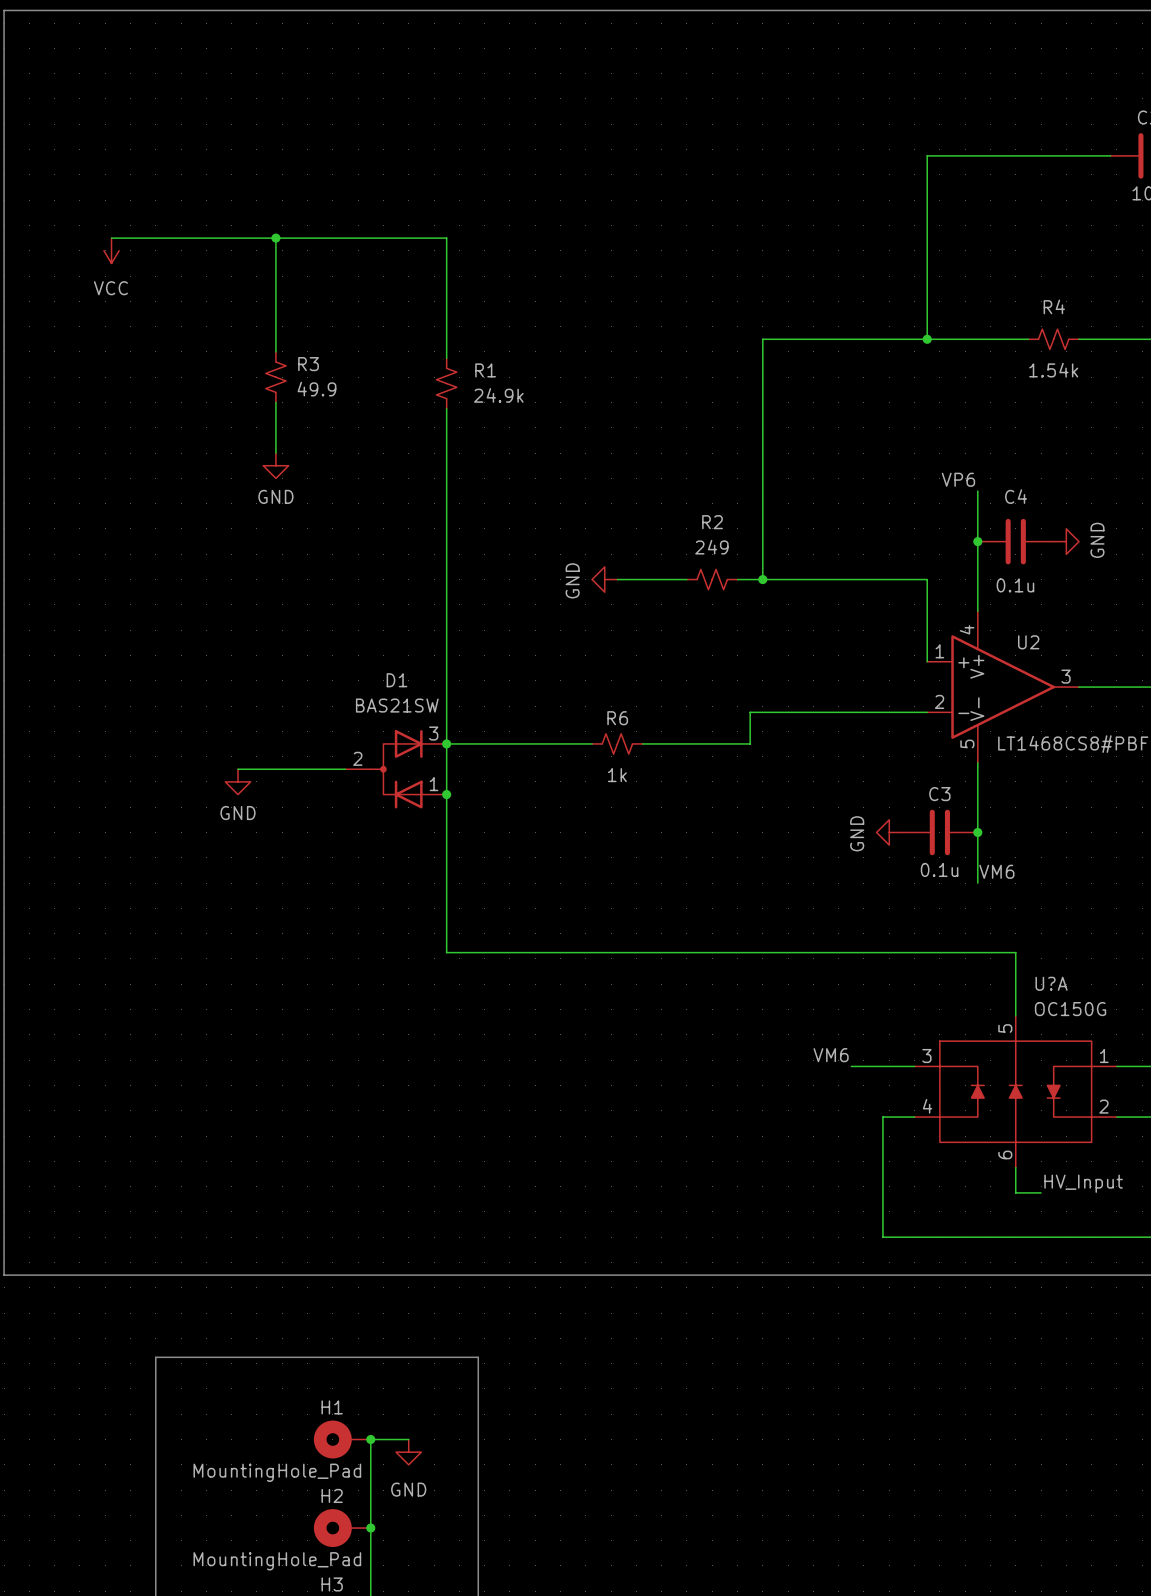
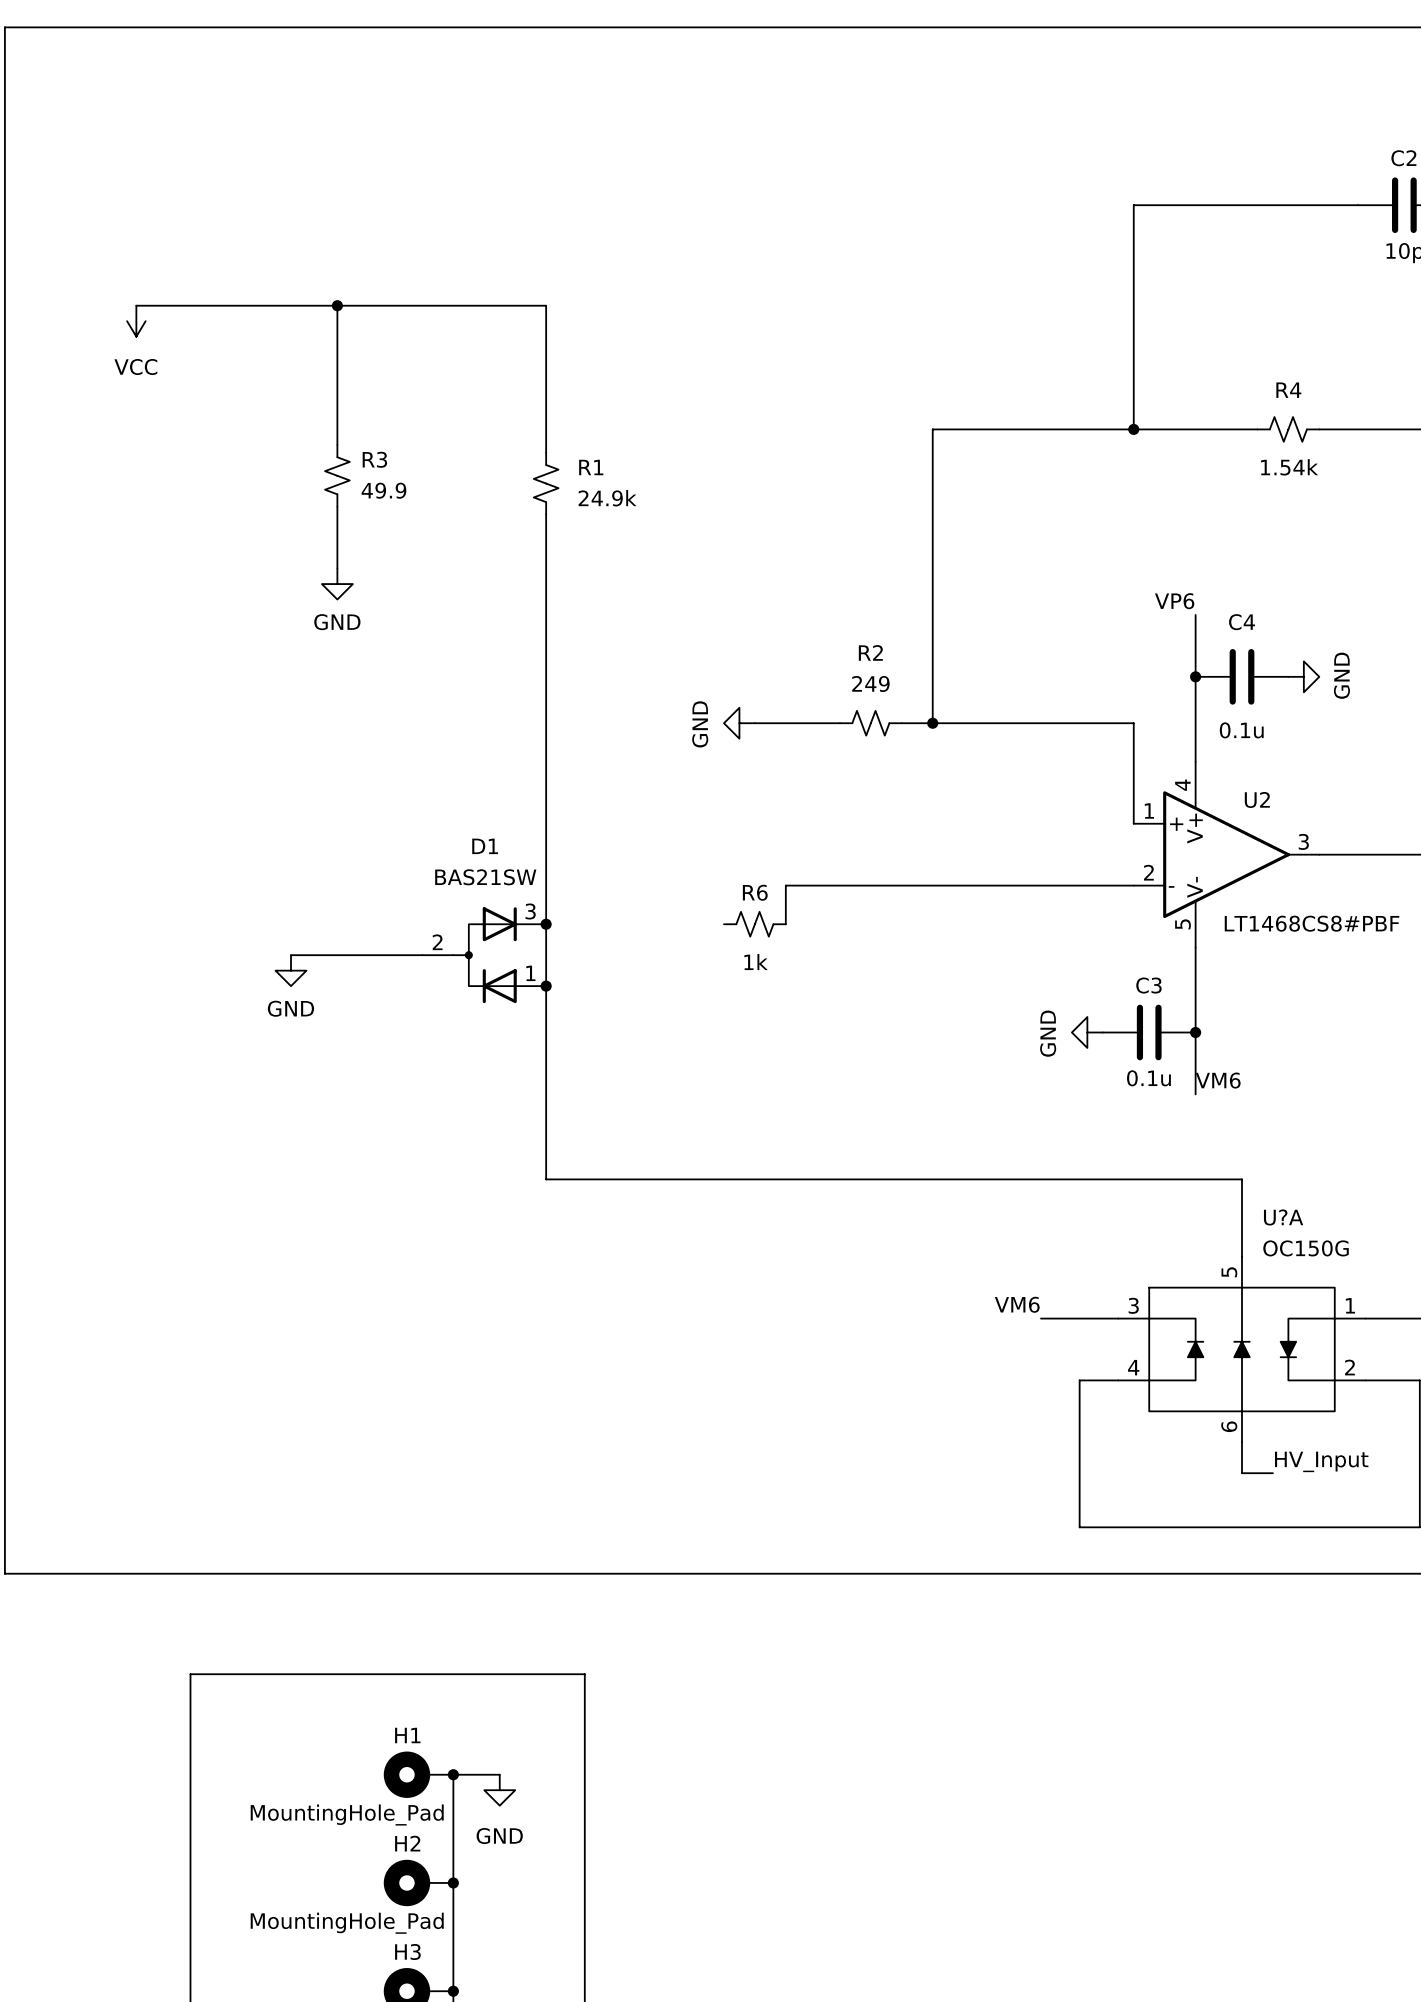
wire: (750, 712) (750, 743) (642, 743) -> (917, 885) (785, 885) (785, 924)
wire: (446, 743) (592, 743) -> none

